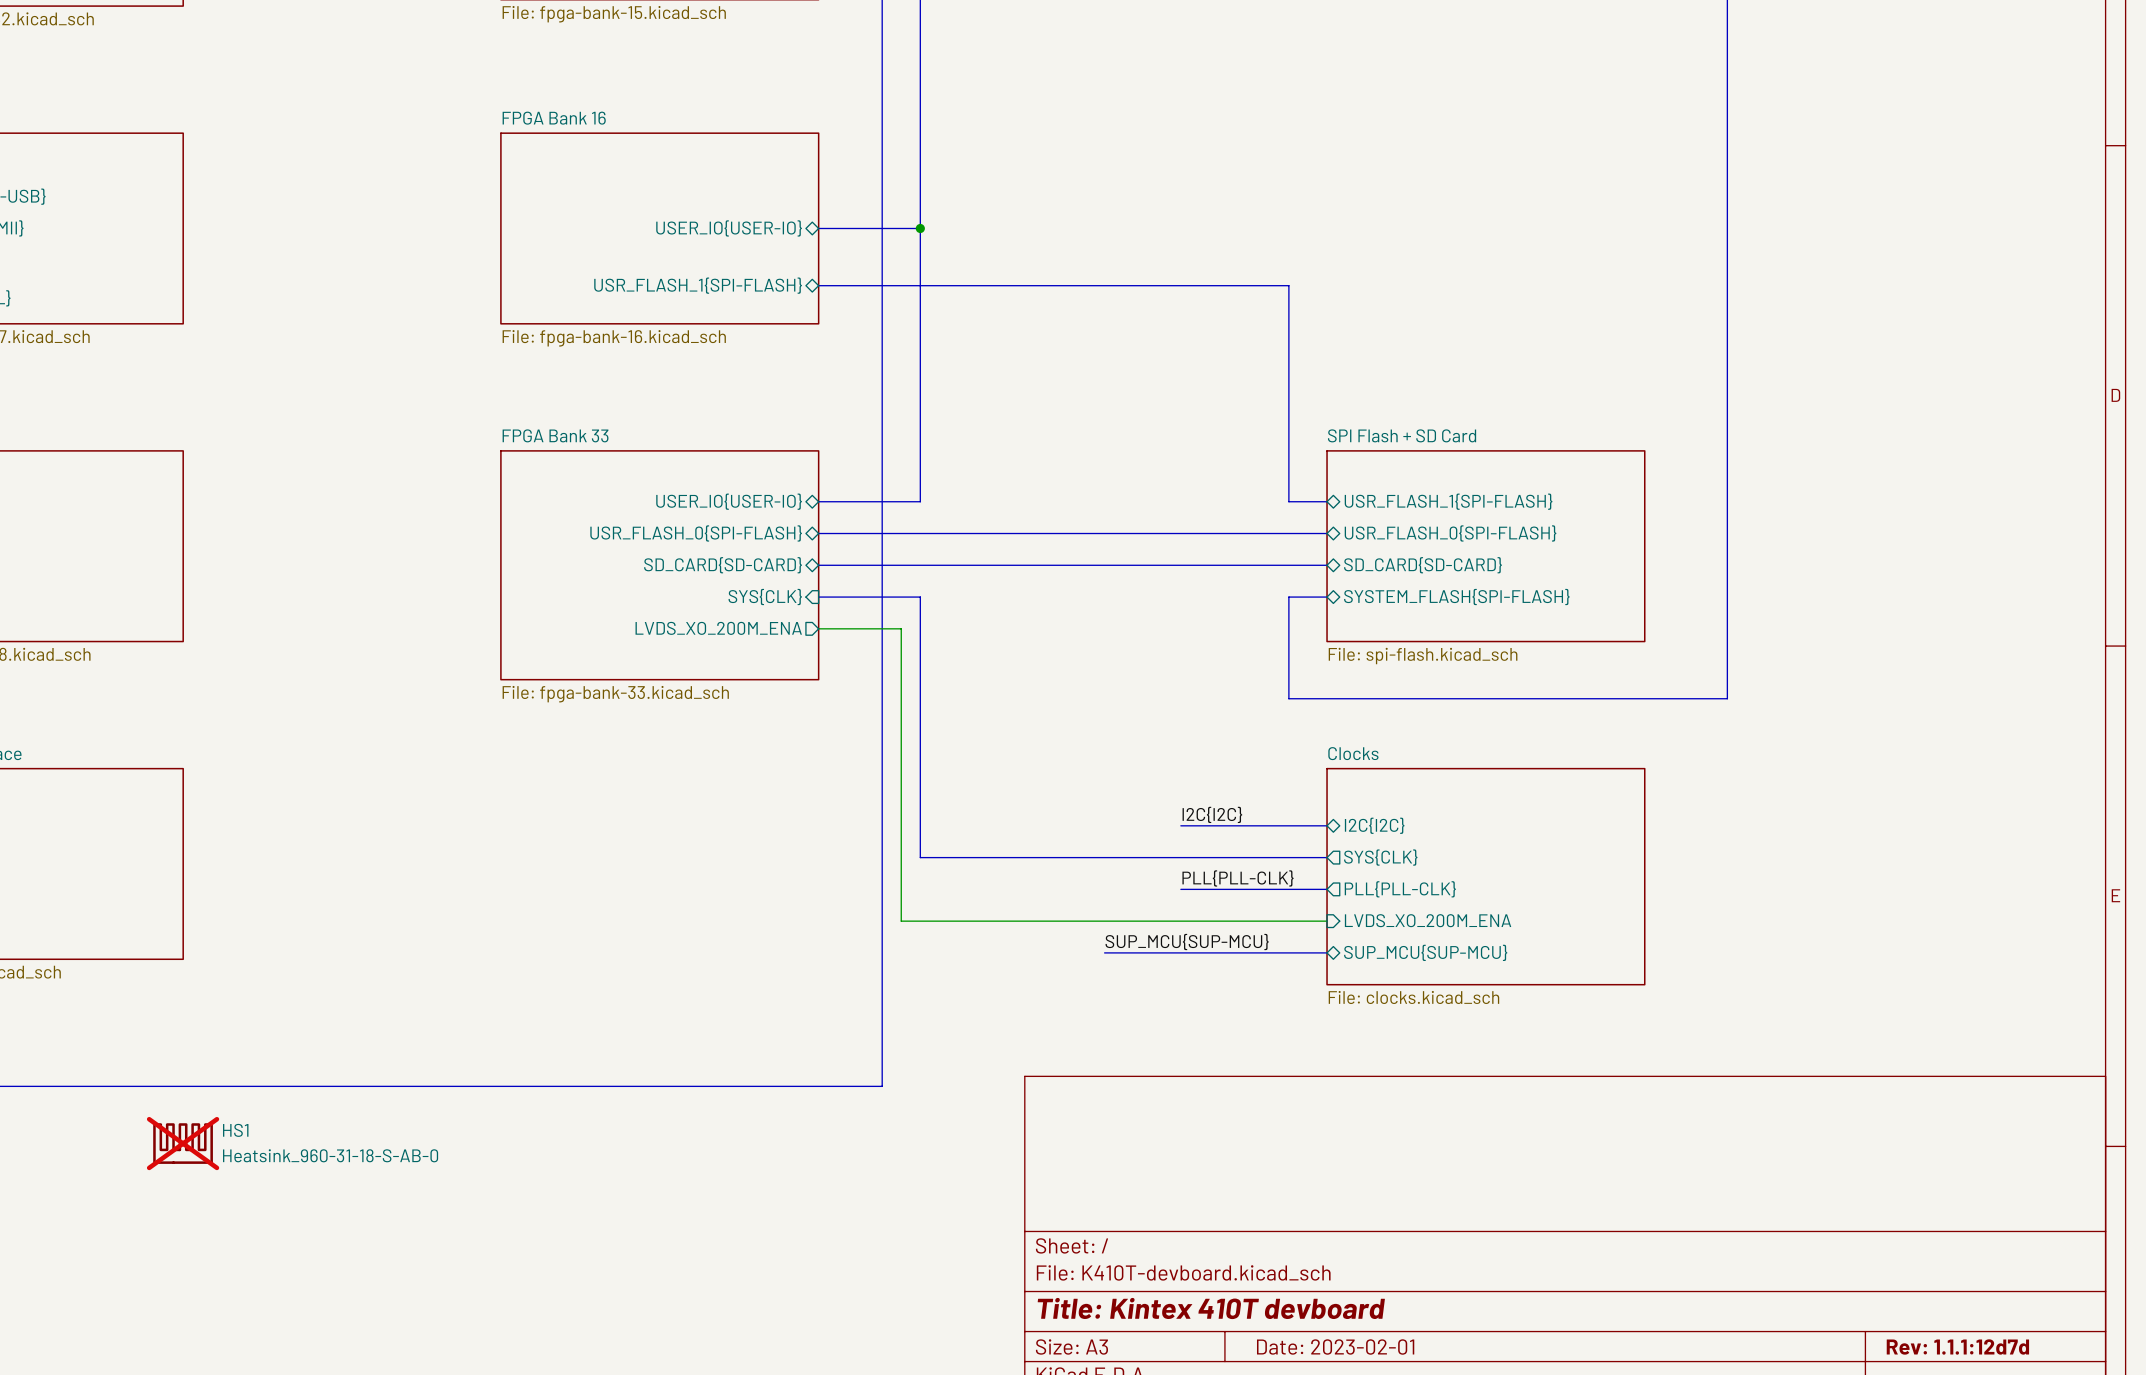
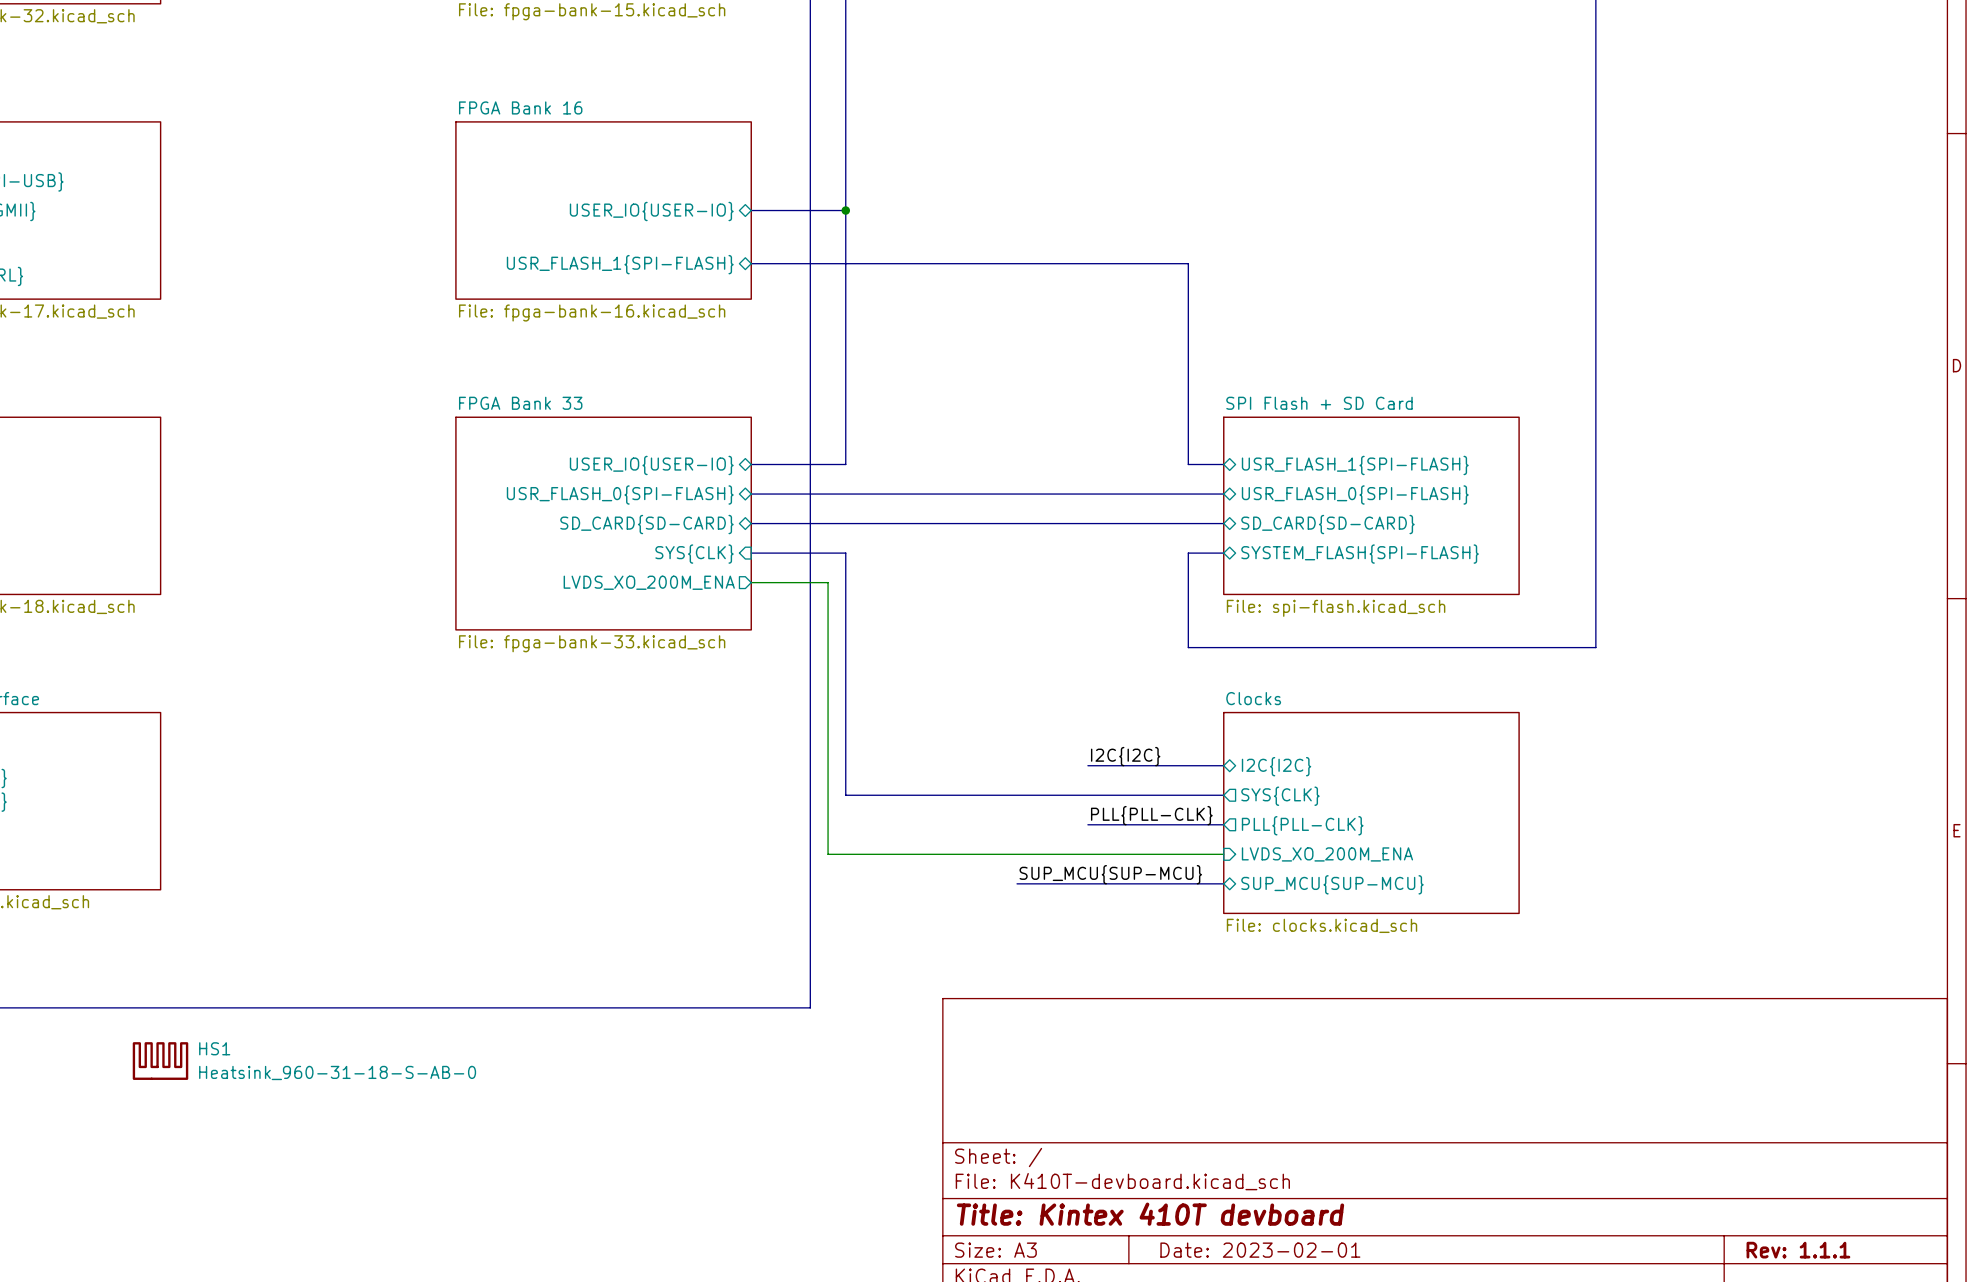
HS1 do-not-place cross: (183, 1143) -> none
title block: Rev: 1.1.1:12d7d (1957, 1347) -> Rev: 1.1.1 (1798, 1250)

